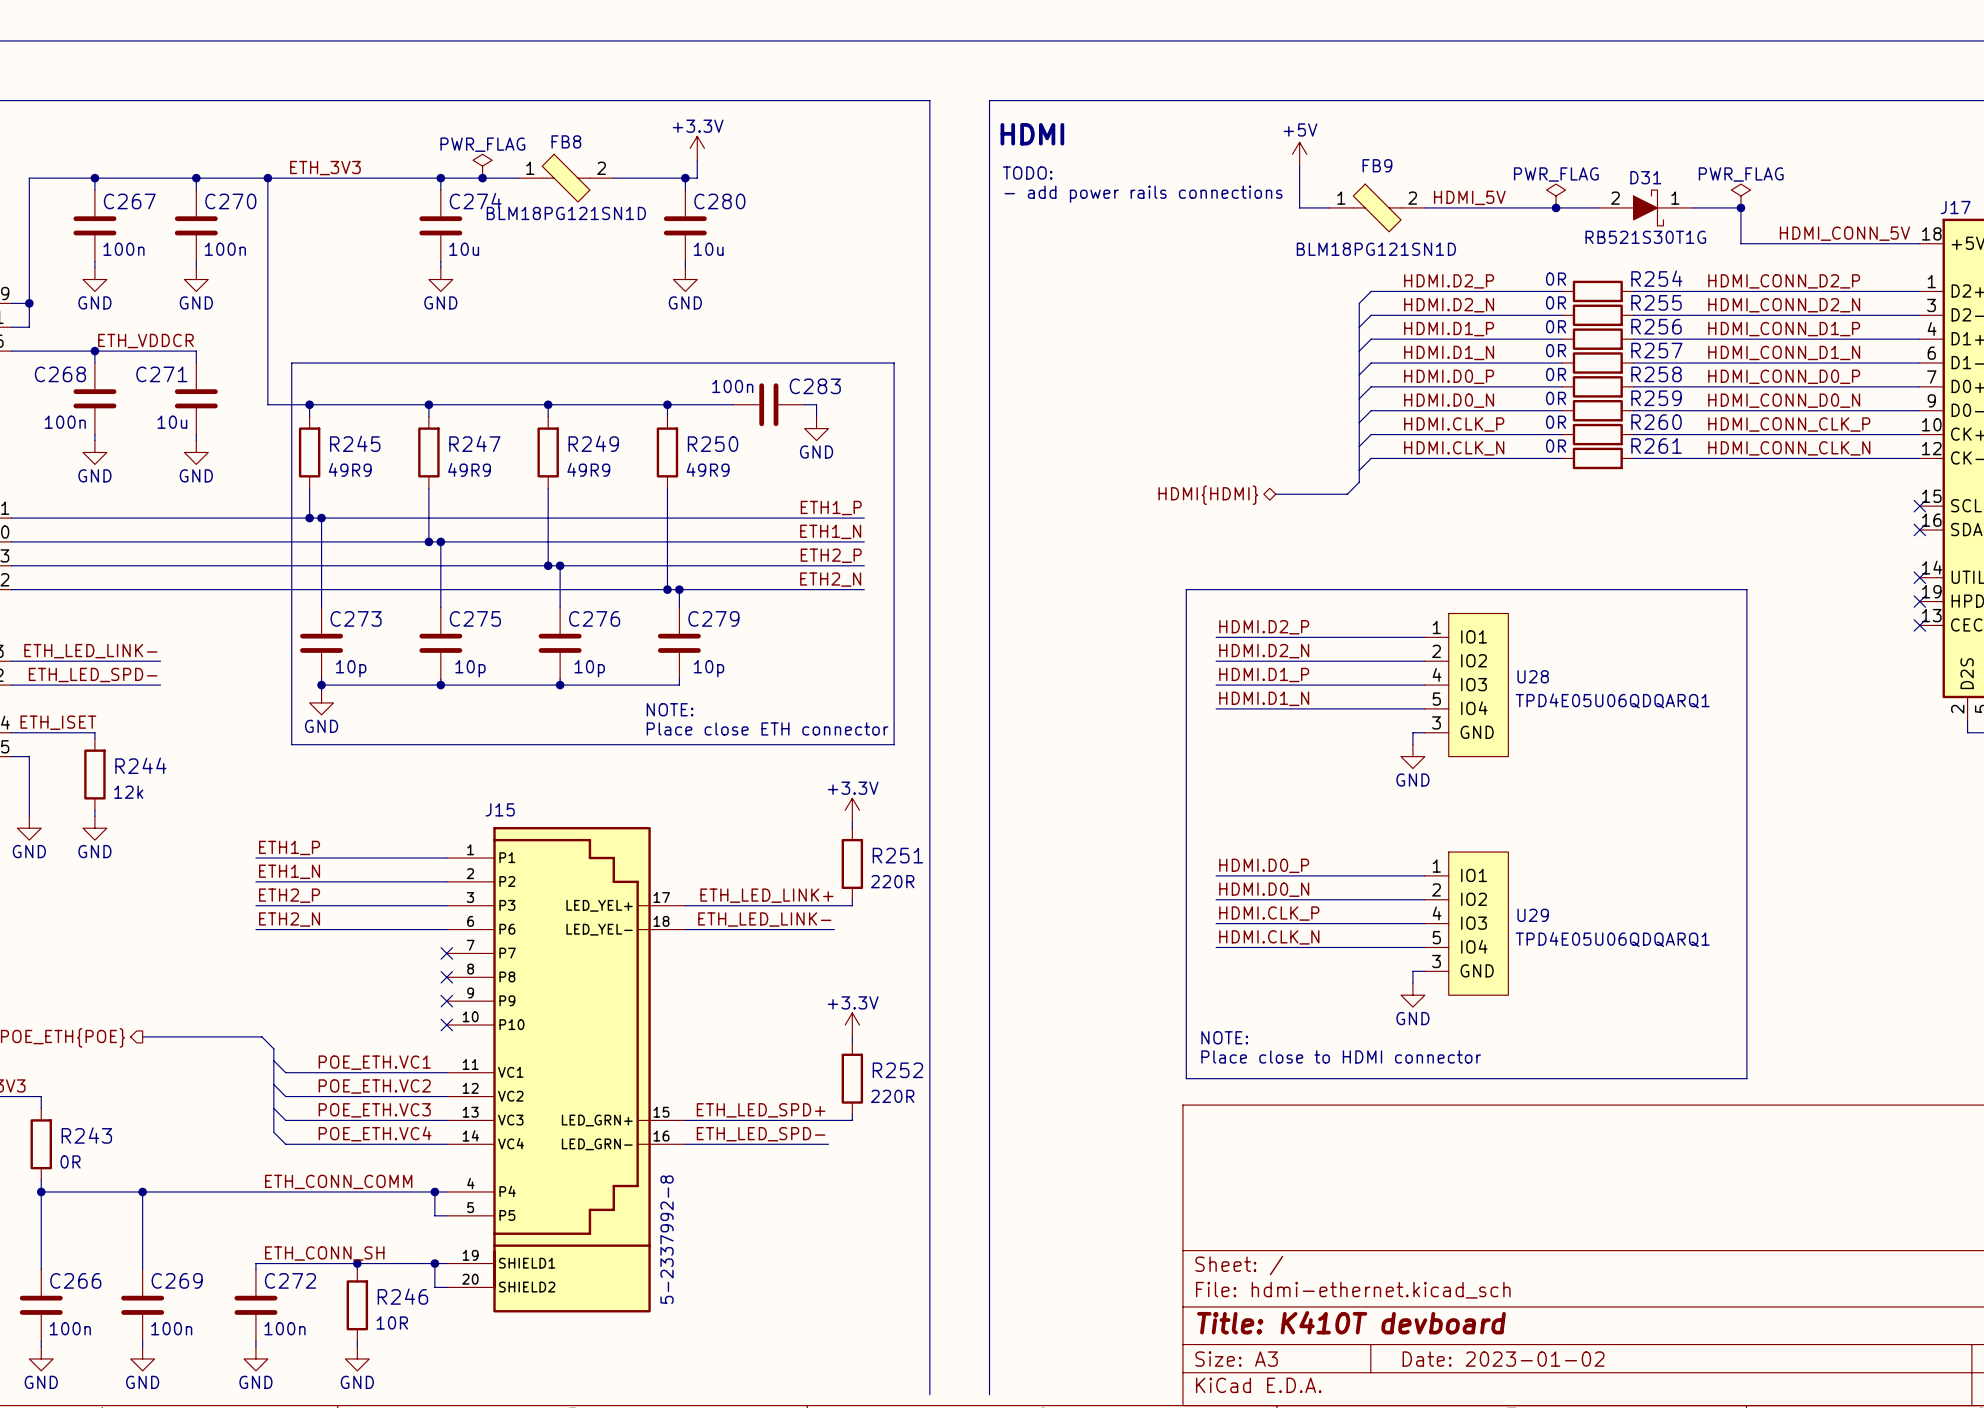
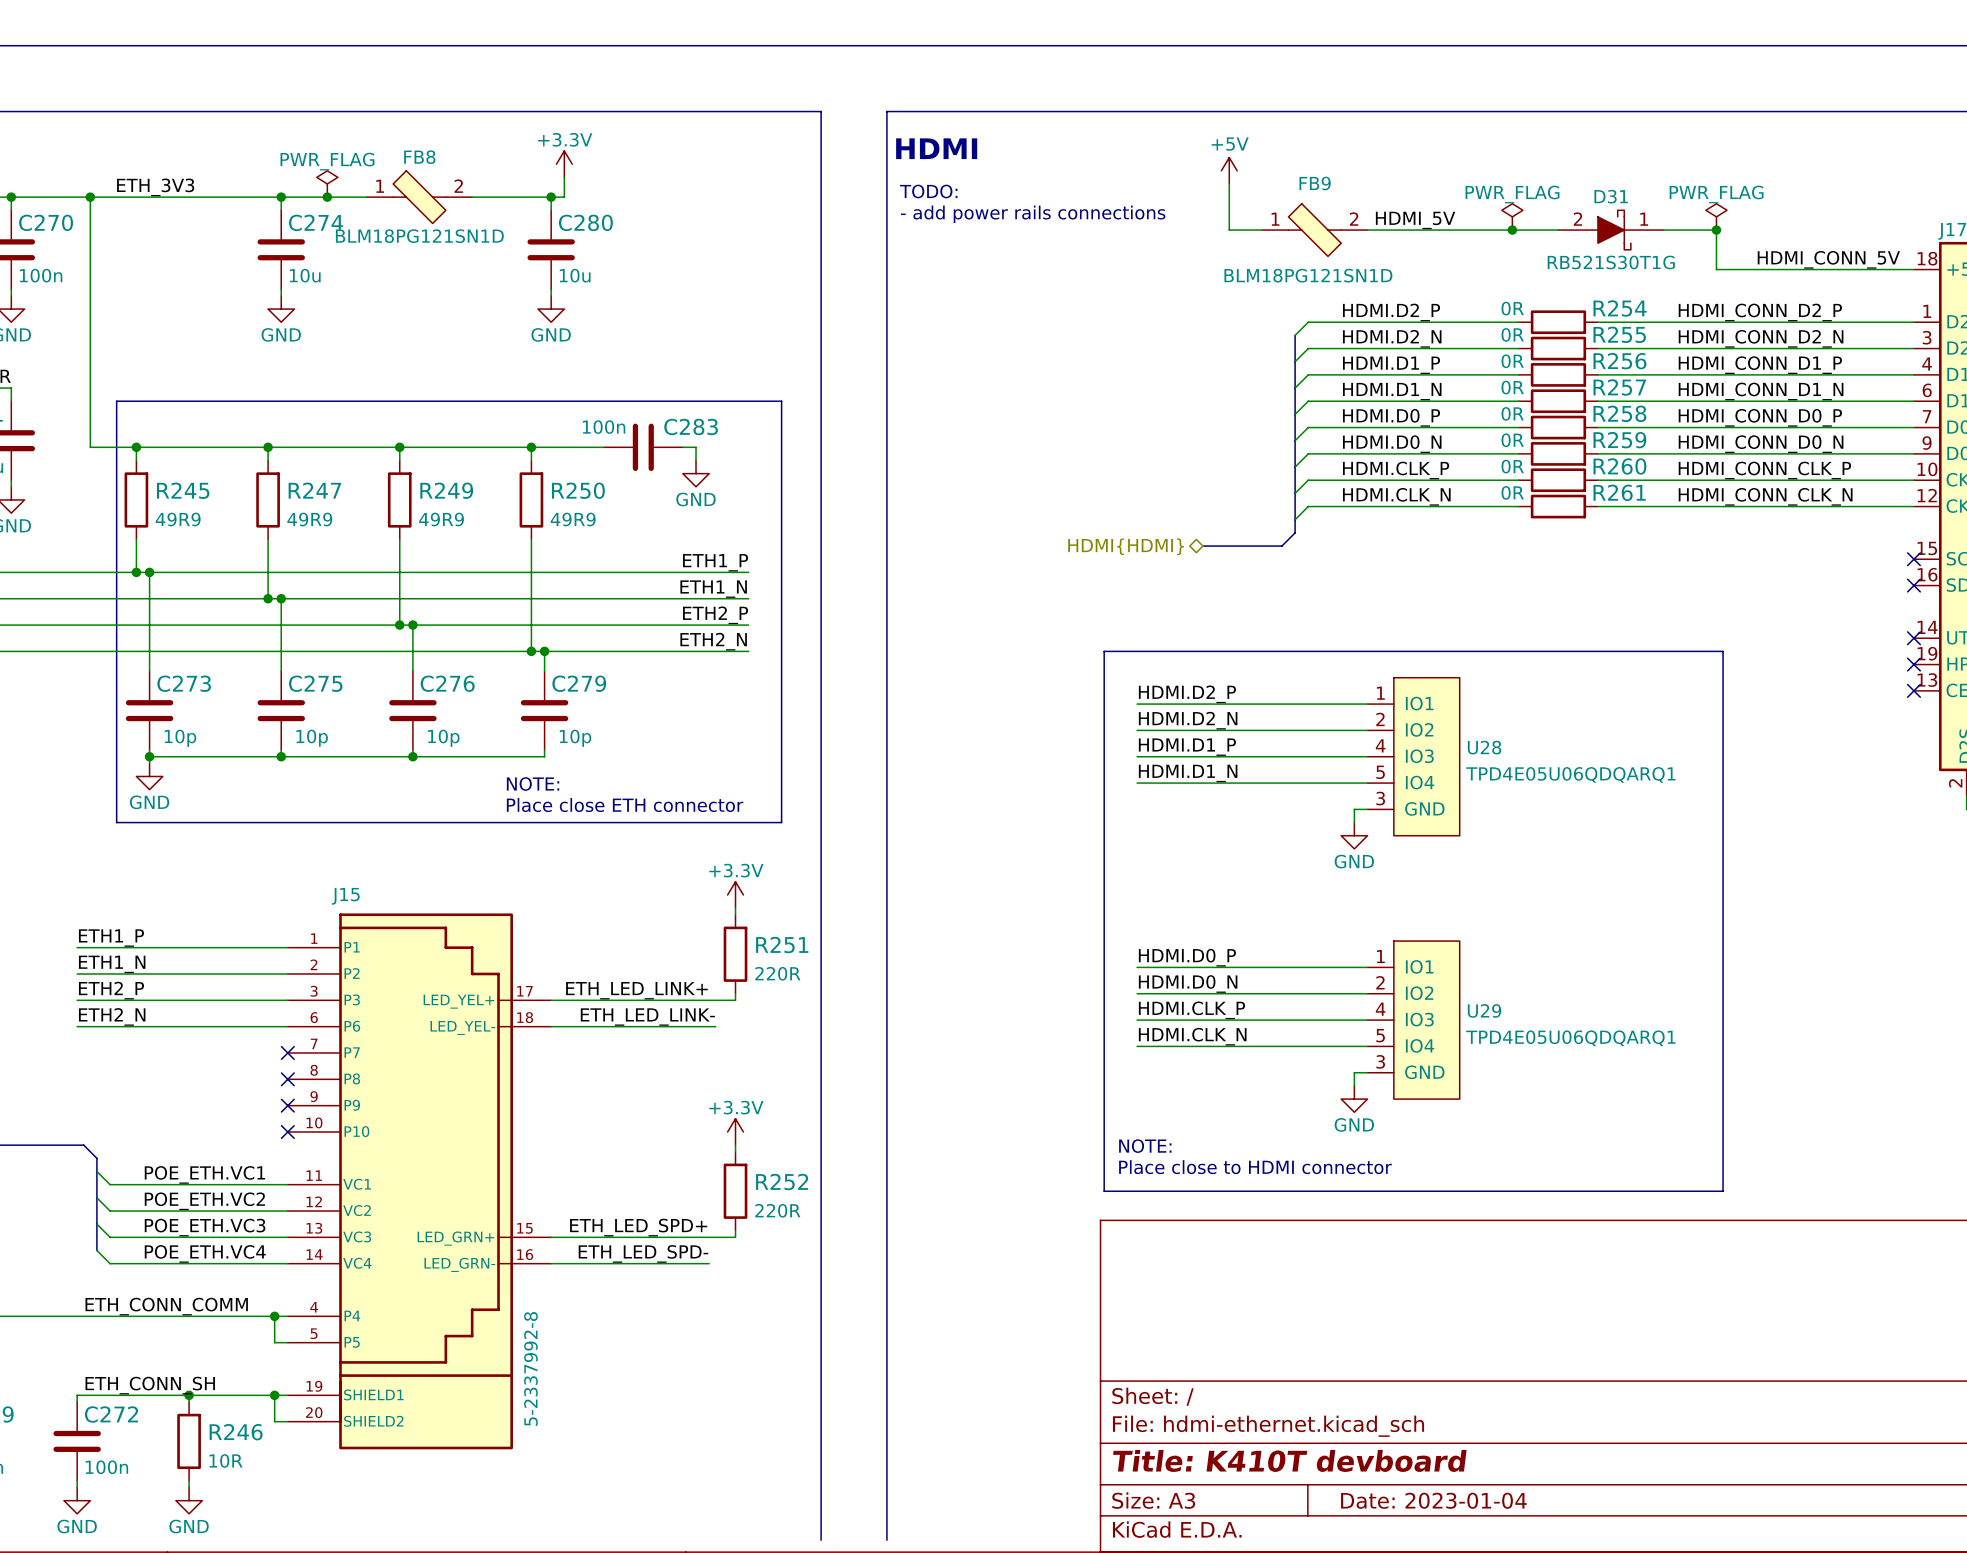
title block: Date: 2023-01-02 (1503, 1359) -> Date: 2023-01-04 (1433, 1500)

